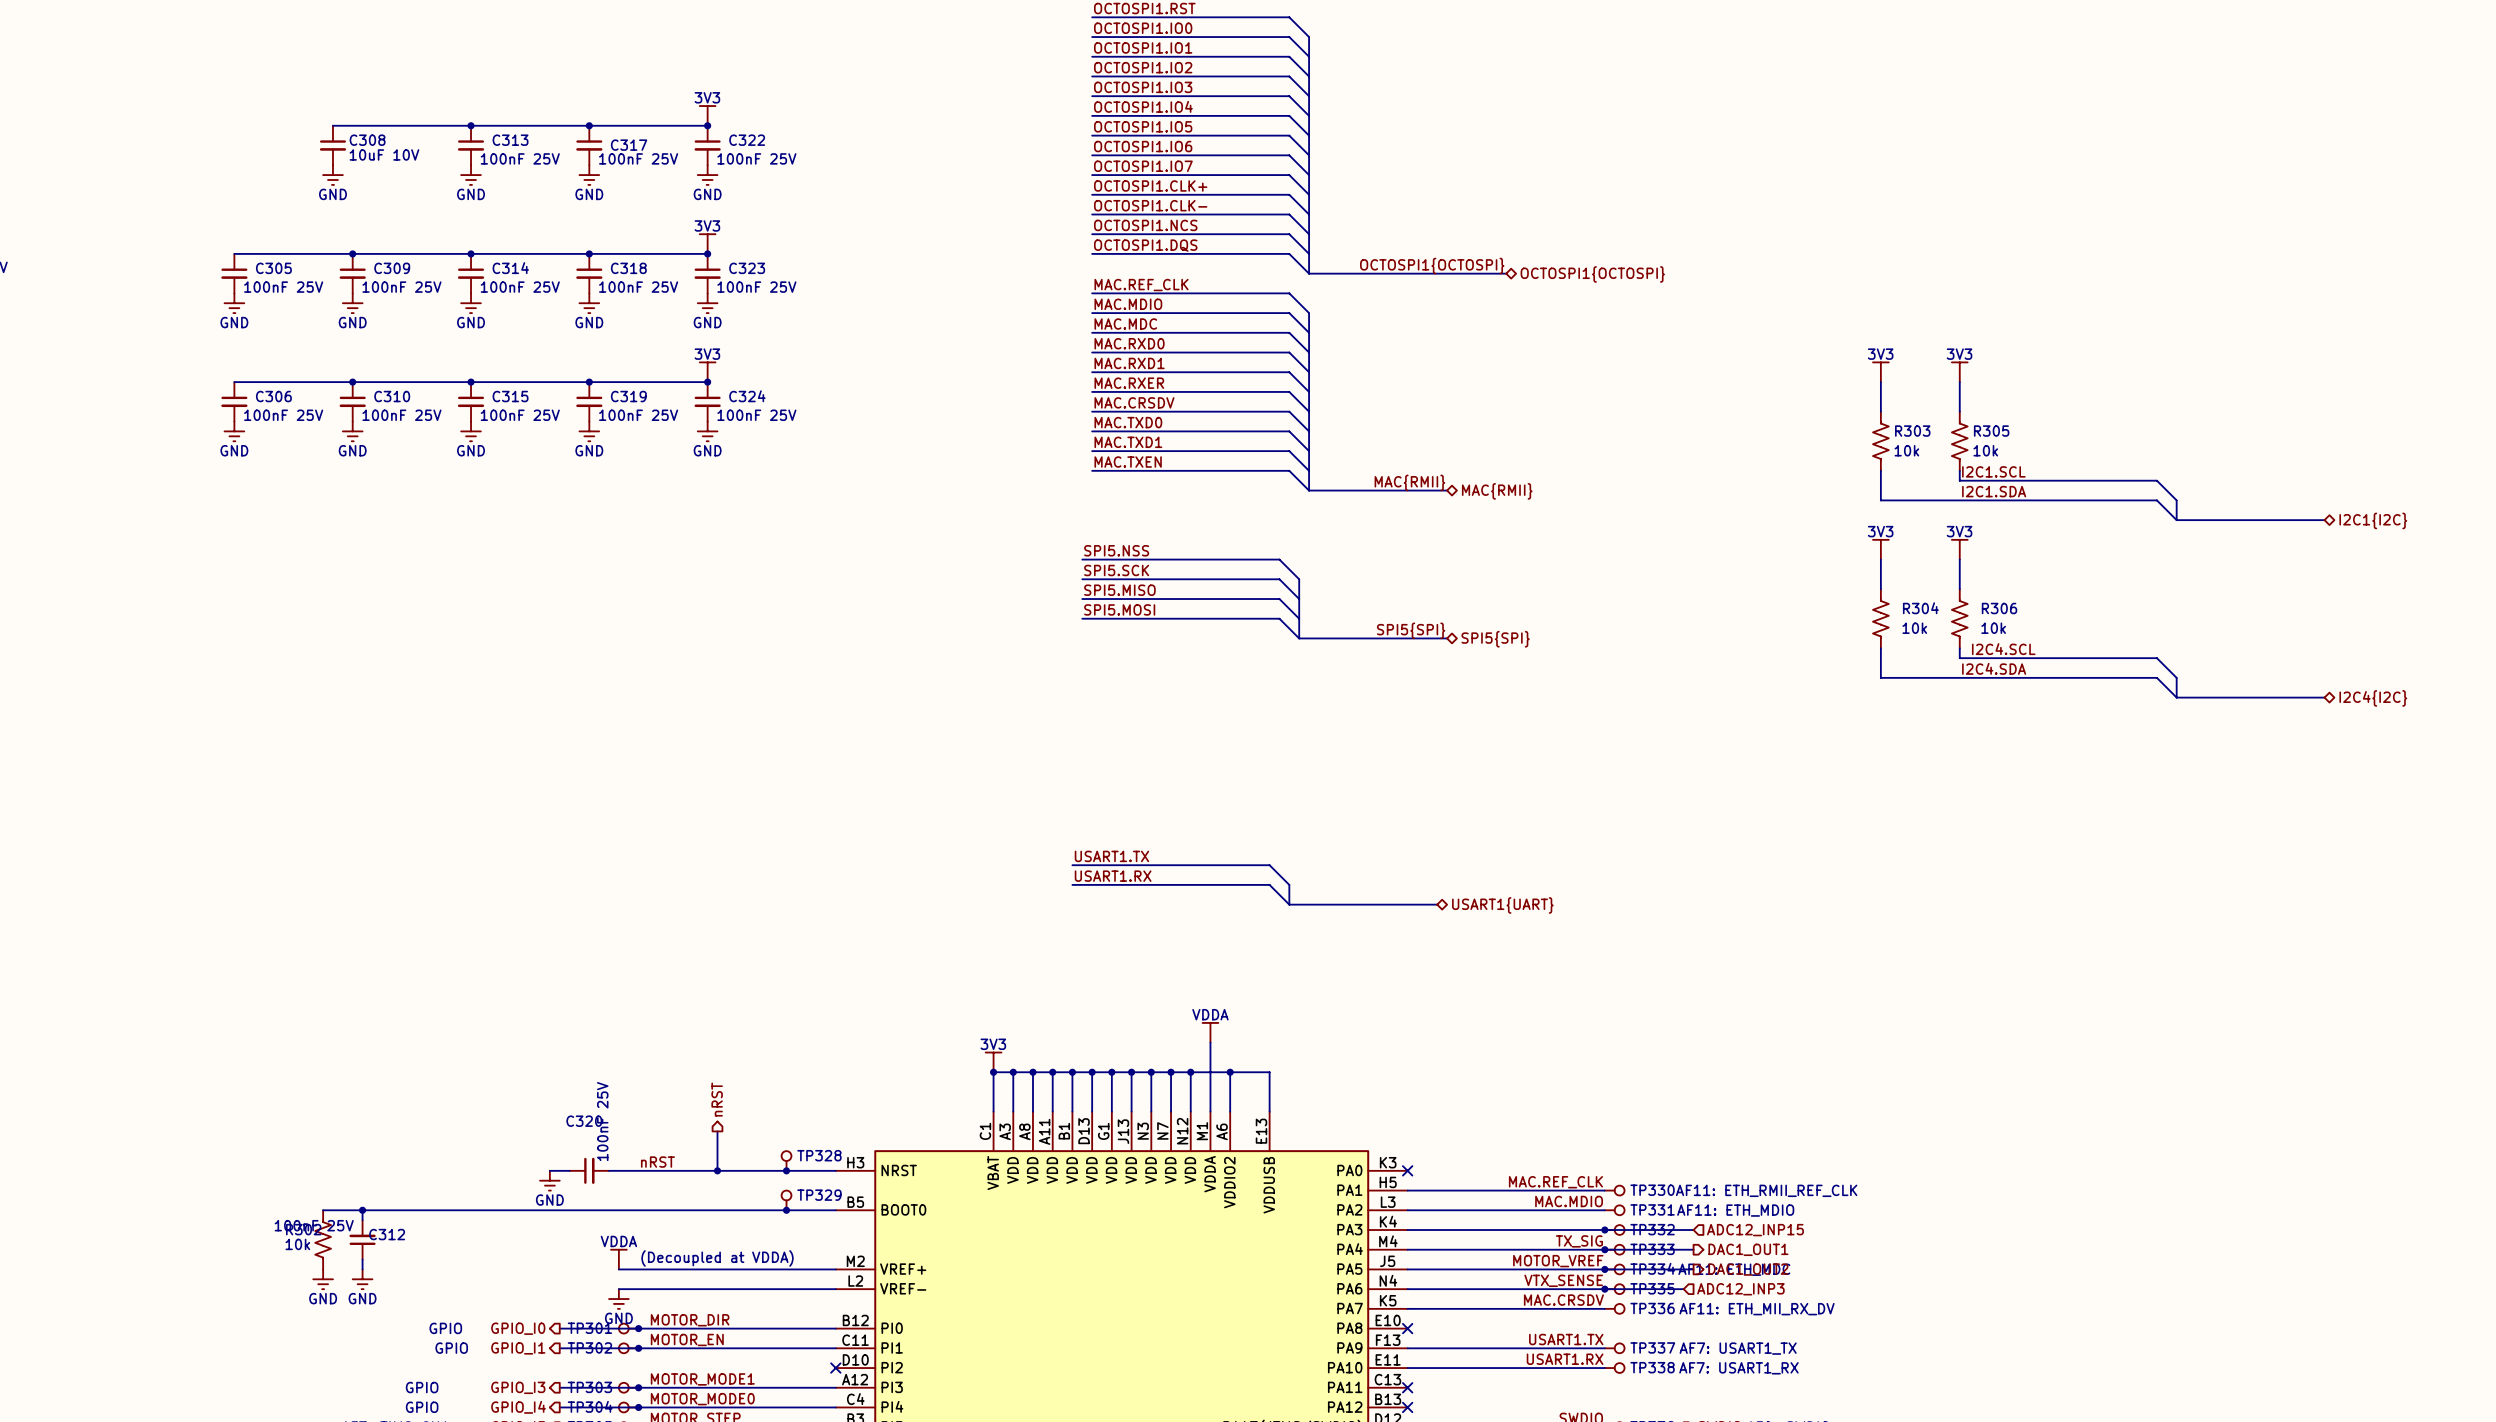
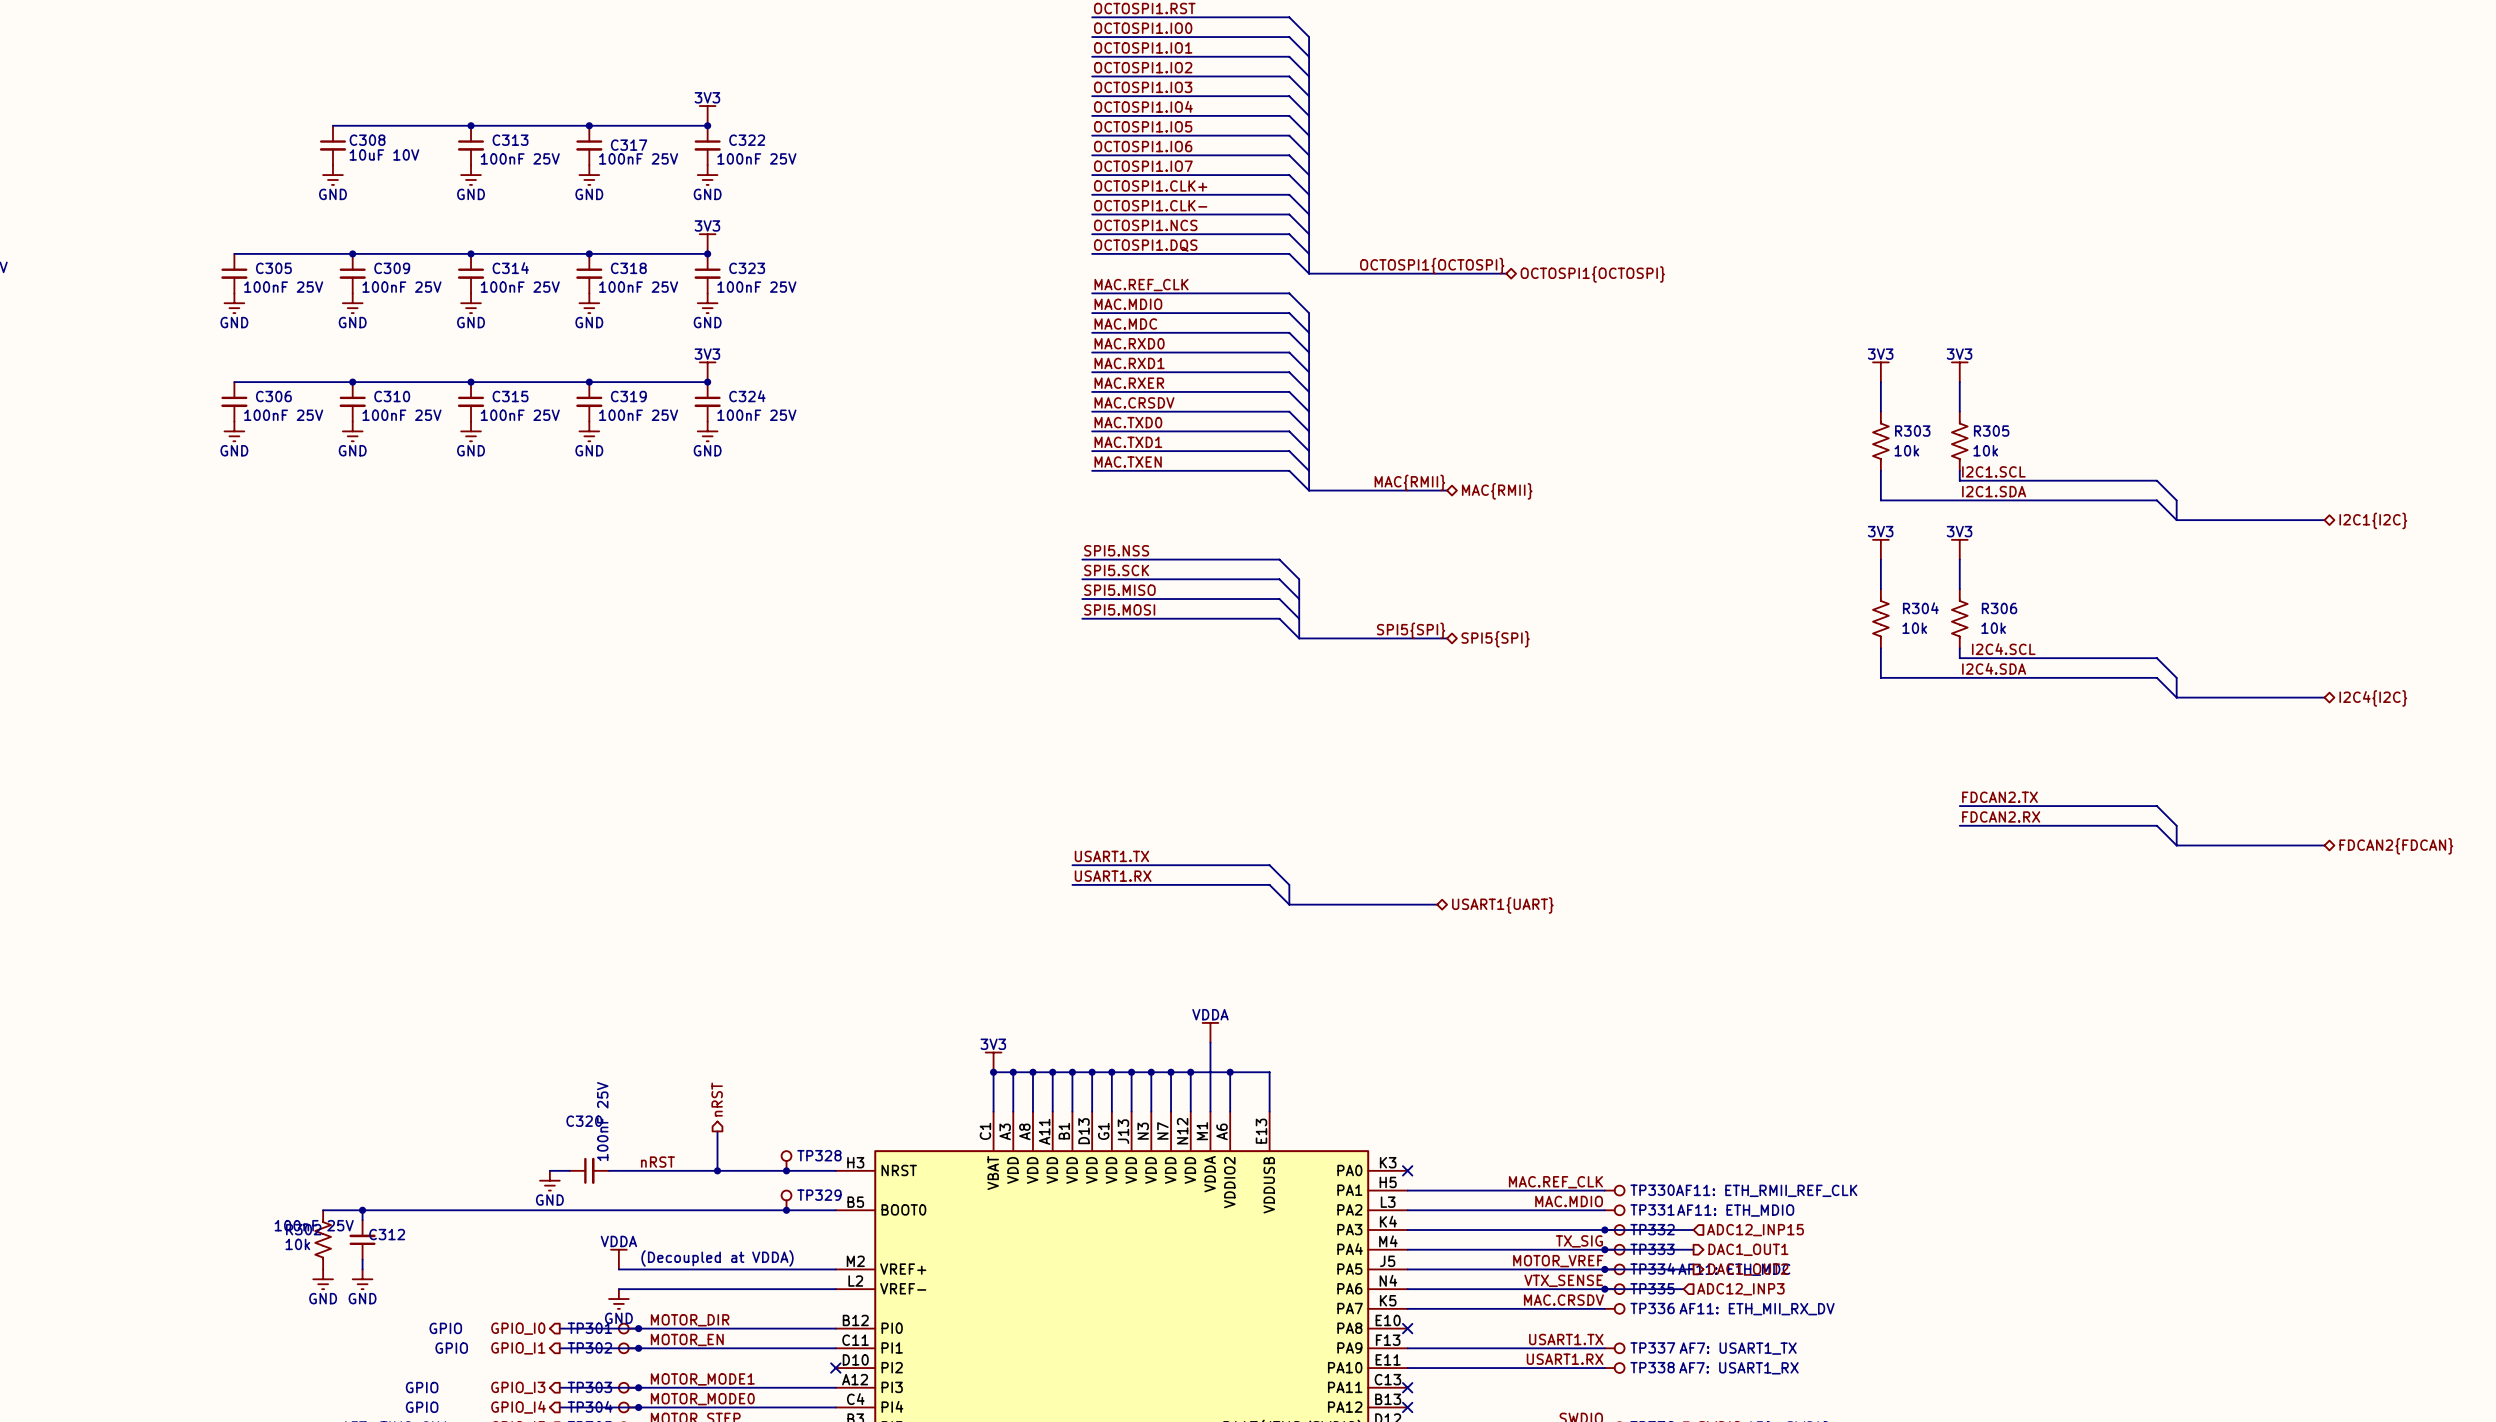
label: none -> FDCAN2.TX (1999, 797)
wire: none -> (1959, 806) (2156, 806) (2176, 825)
label: none -> FDCAN2.RX (2001, 816)
wire: none -> (1959, 825) (2156, 825) (2176, 845)
bus: none -> (2176, 825) (2176, 845) (2324, 845)
hierarchical label: none -> FDCAN2{FDCAN} (2396, 846)

